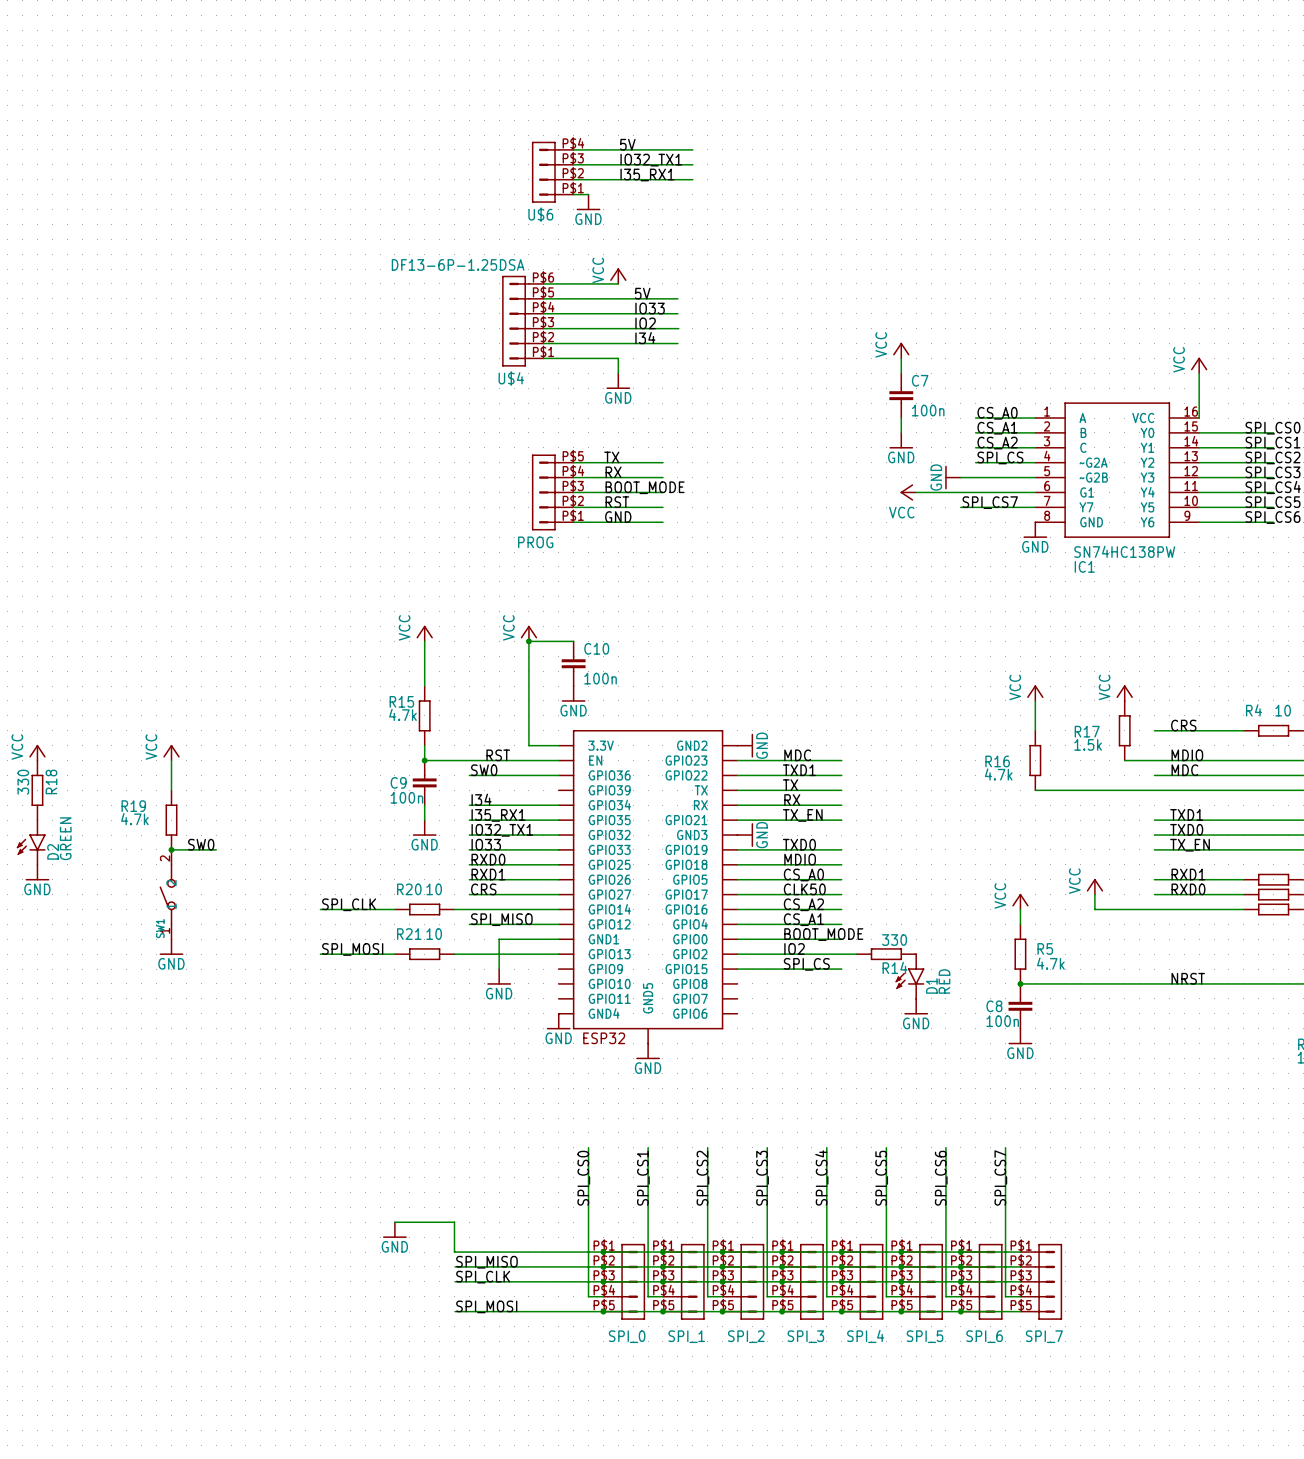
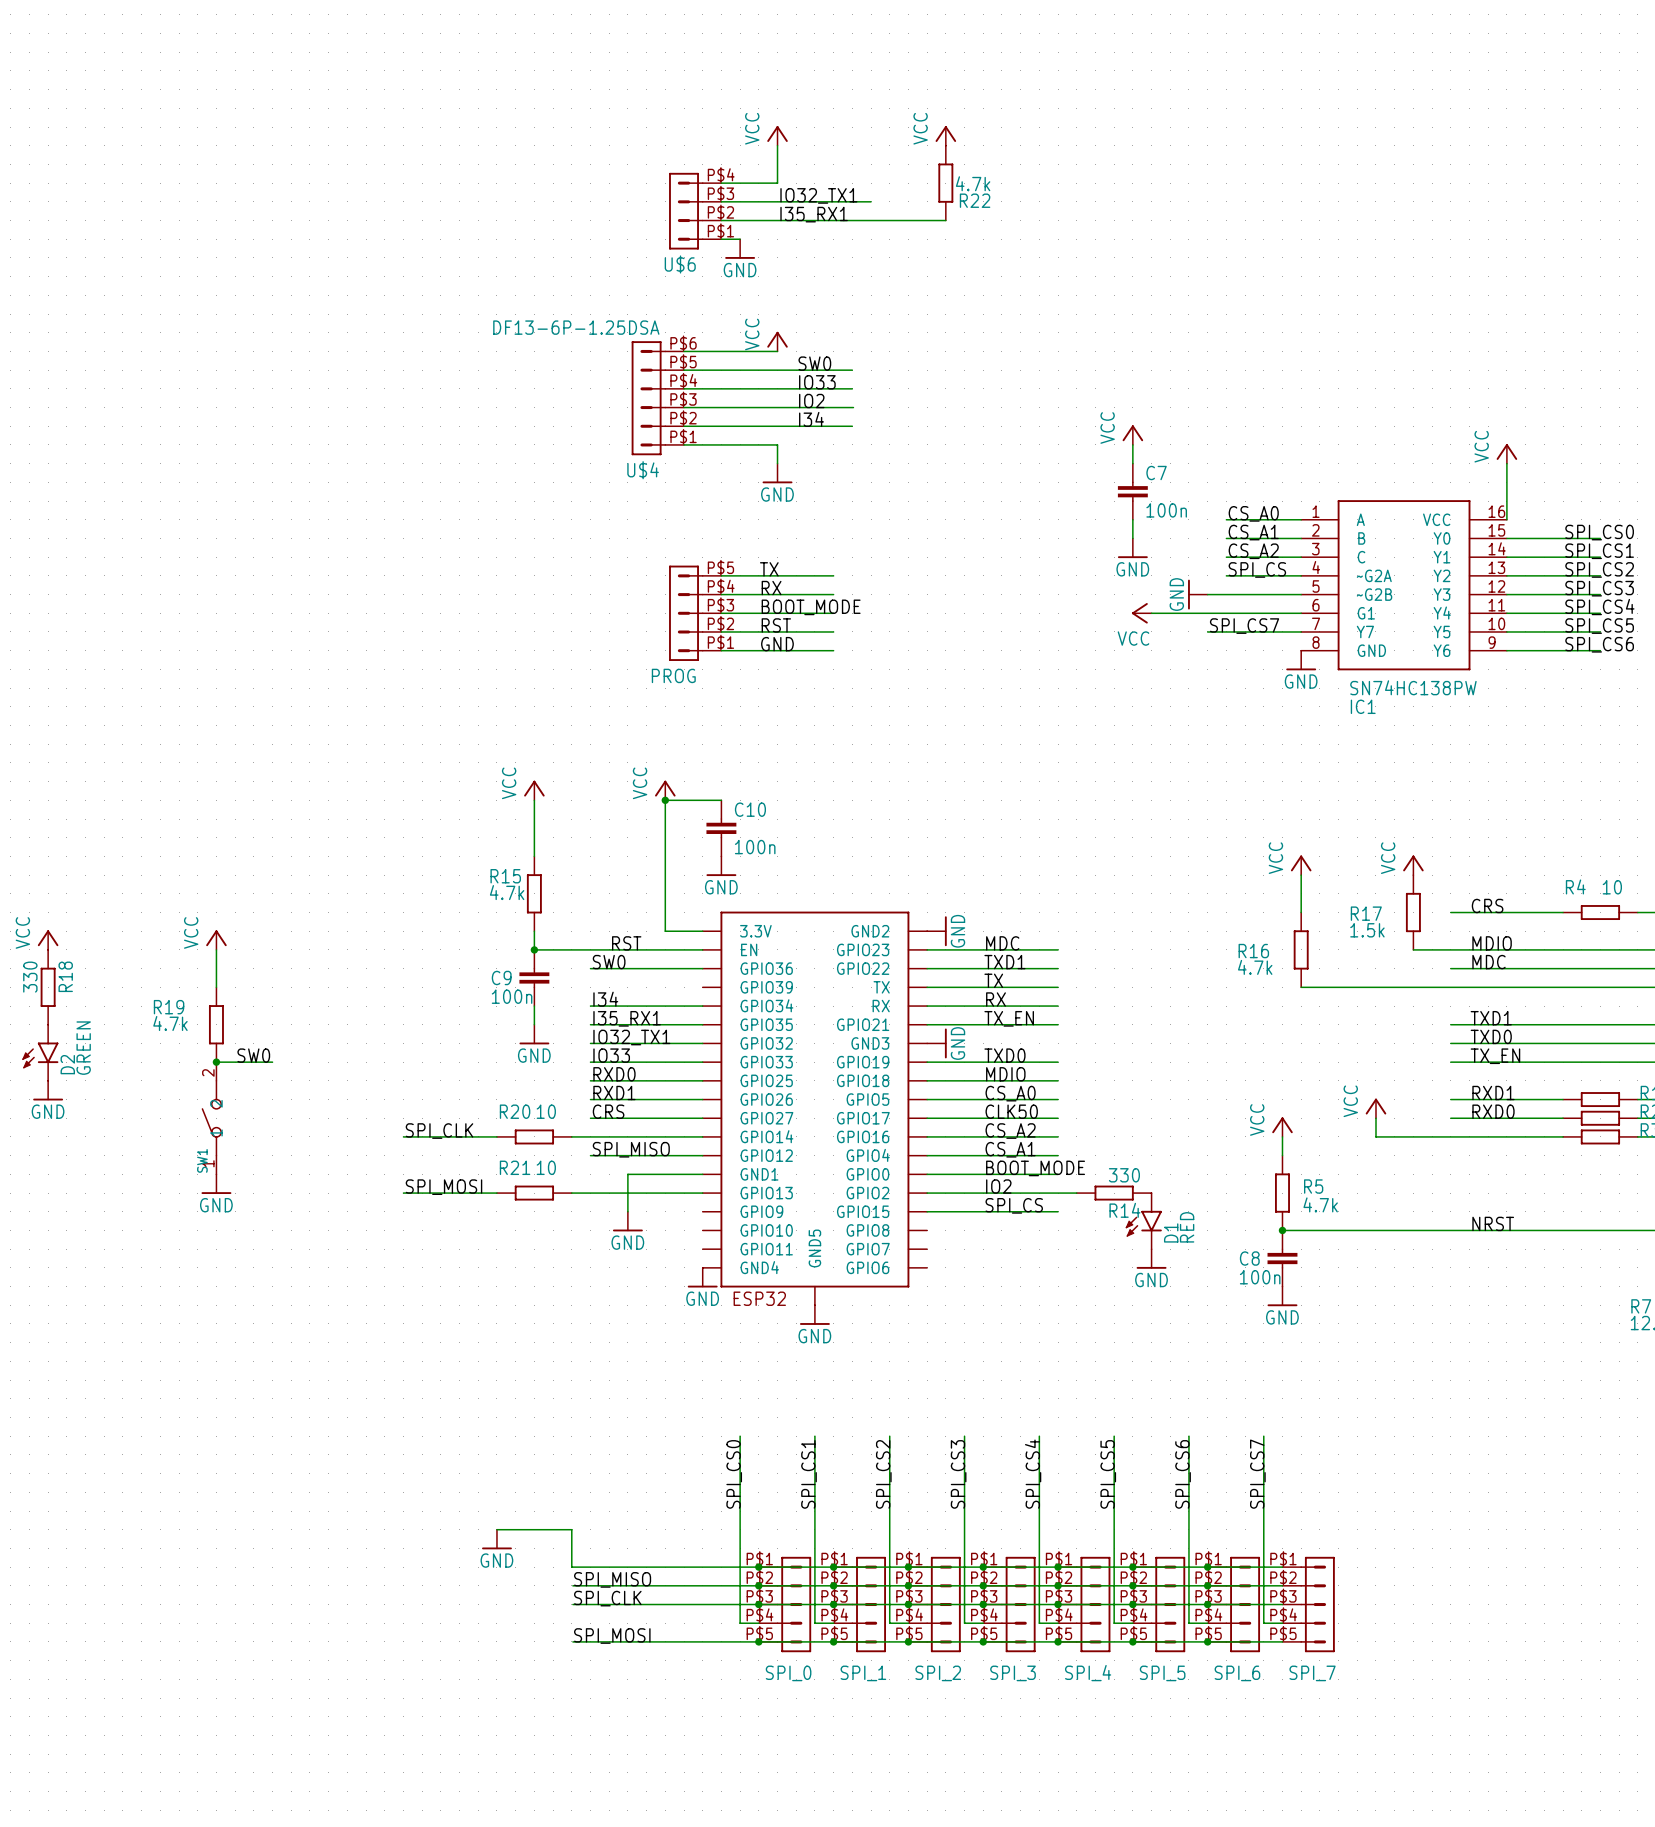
power symbol: none -> VCC (777, 135)
power symbol: none -> VCC (945, 135)
label: 5V (627, 144) -> none
wire: (618, 149) (692, 149) -> (777, 183) (777, 145)
R22: none -> 4.7k (945, 183)
wire: none -> (871, 220) (945, 220)
label: 5V (642, 293) -> SW0 (814, 363)

